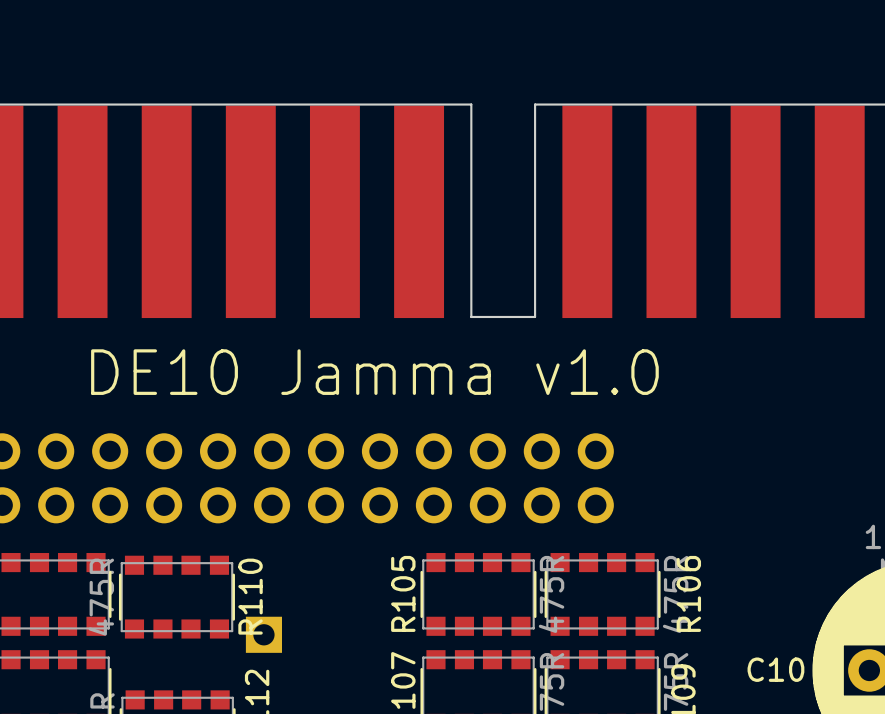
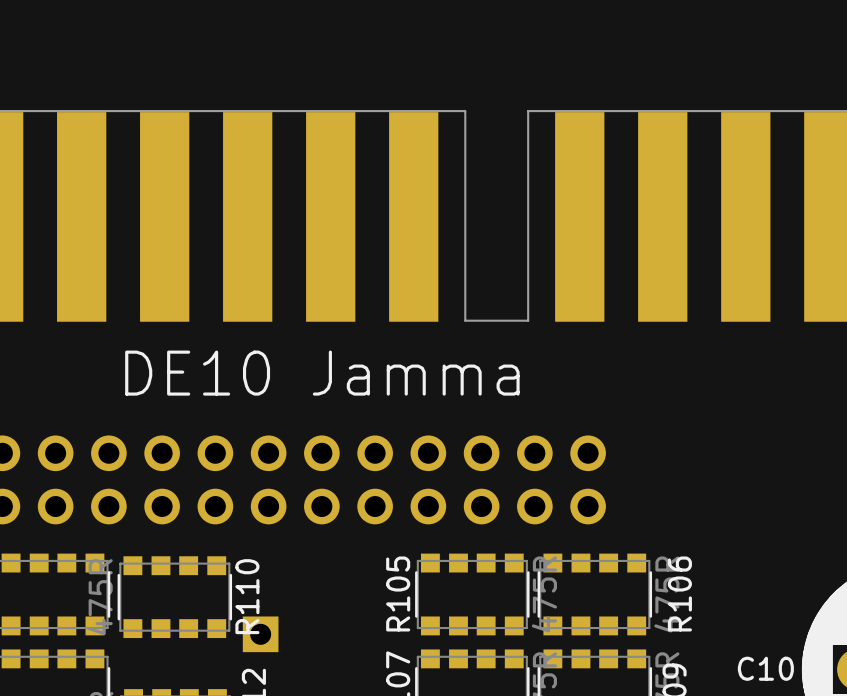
text: DE10 Jamma v1.0 (374, 372) -> DE10 Jamma (322, 373)

